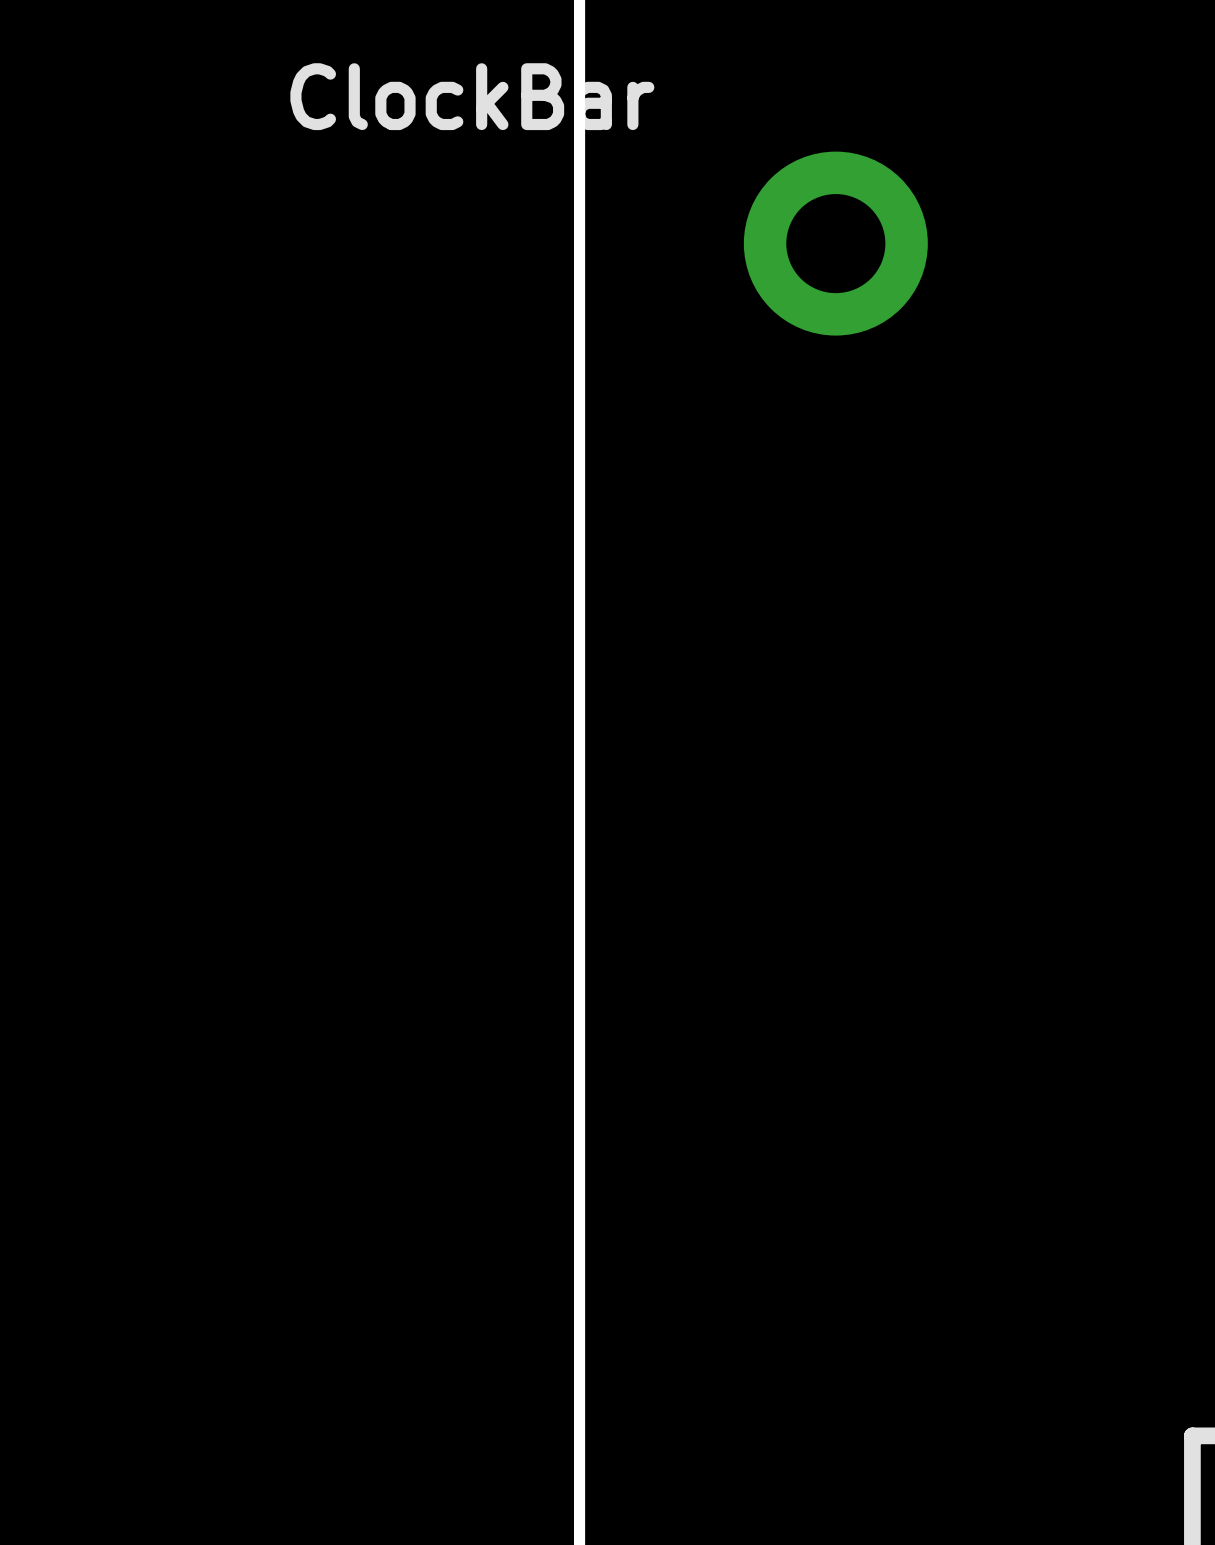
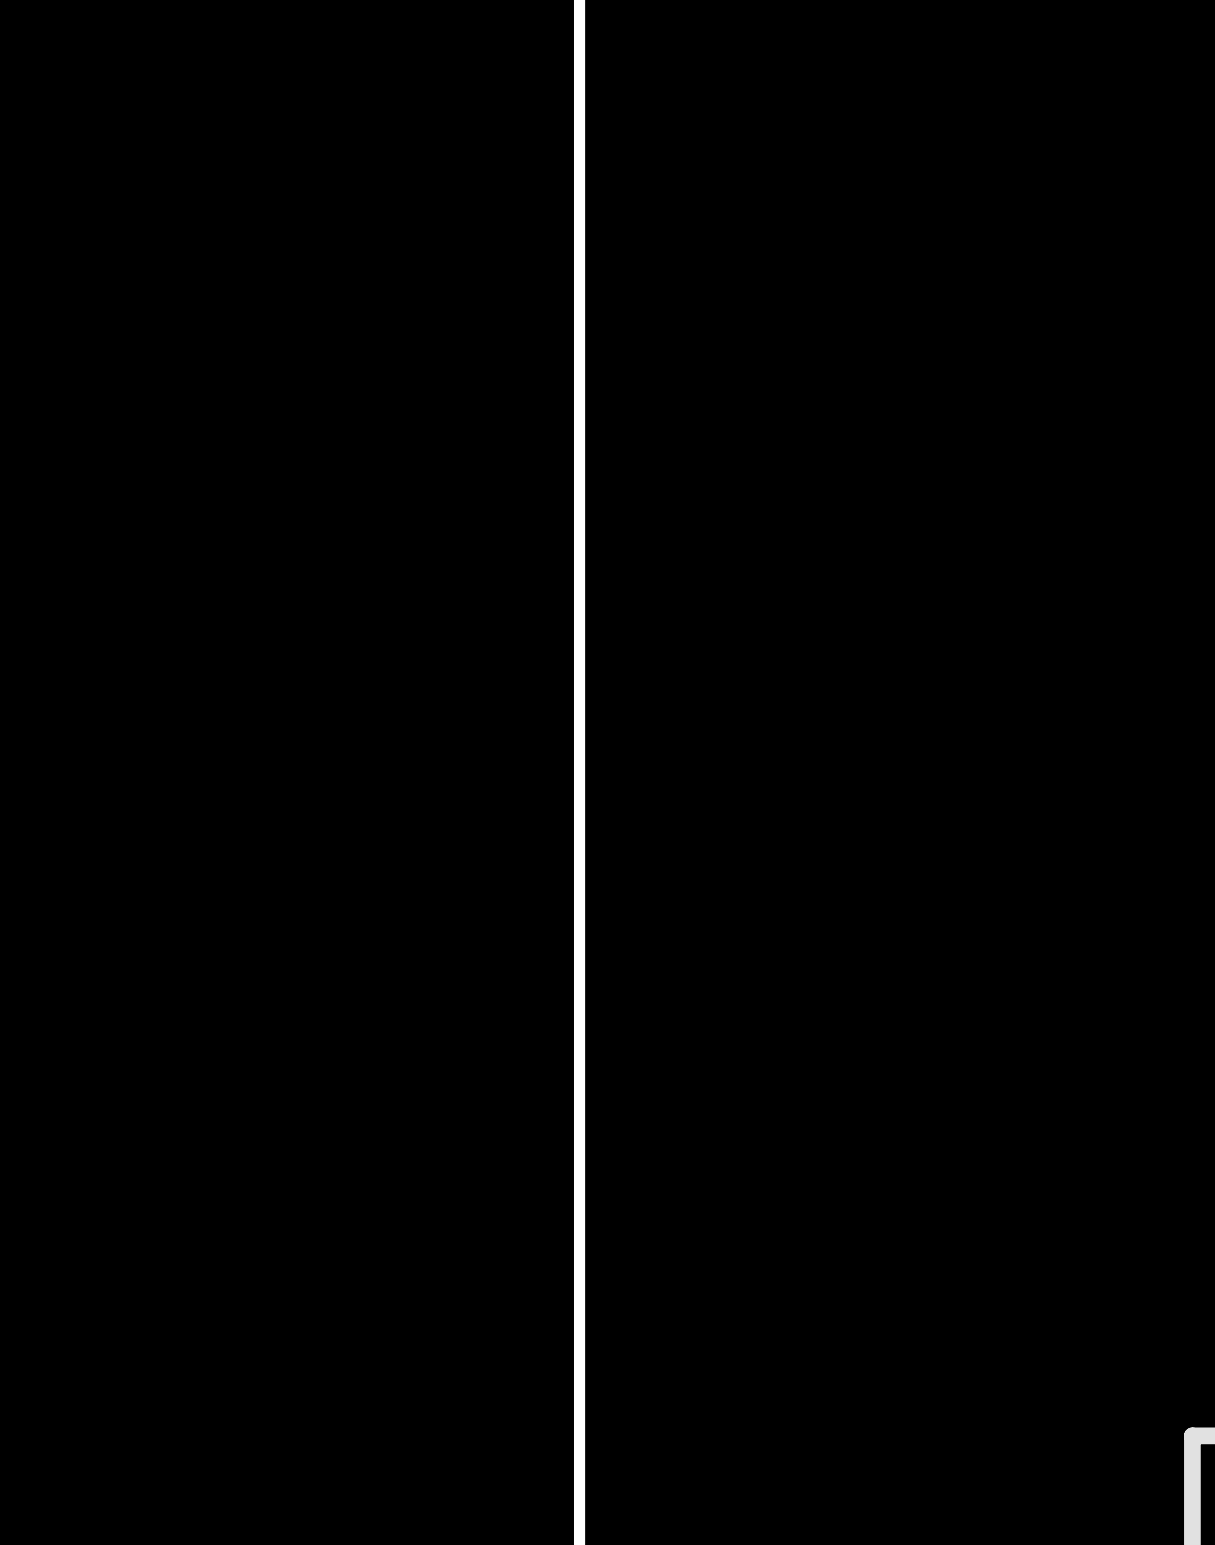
part: ClockBar (835, 243) -> none

